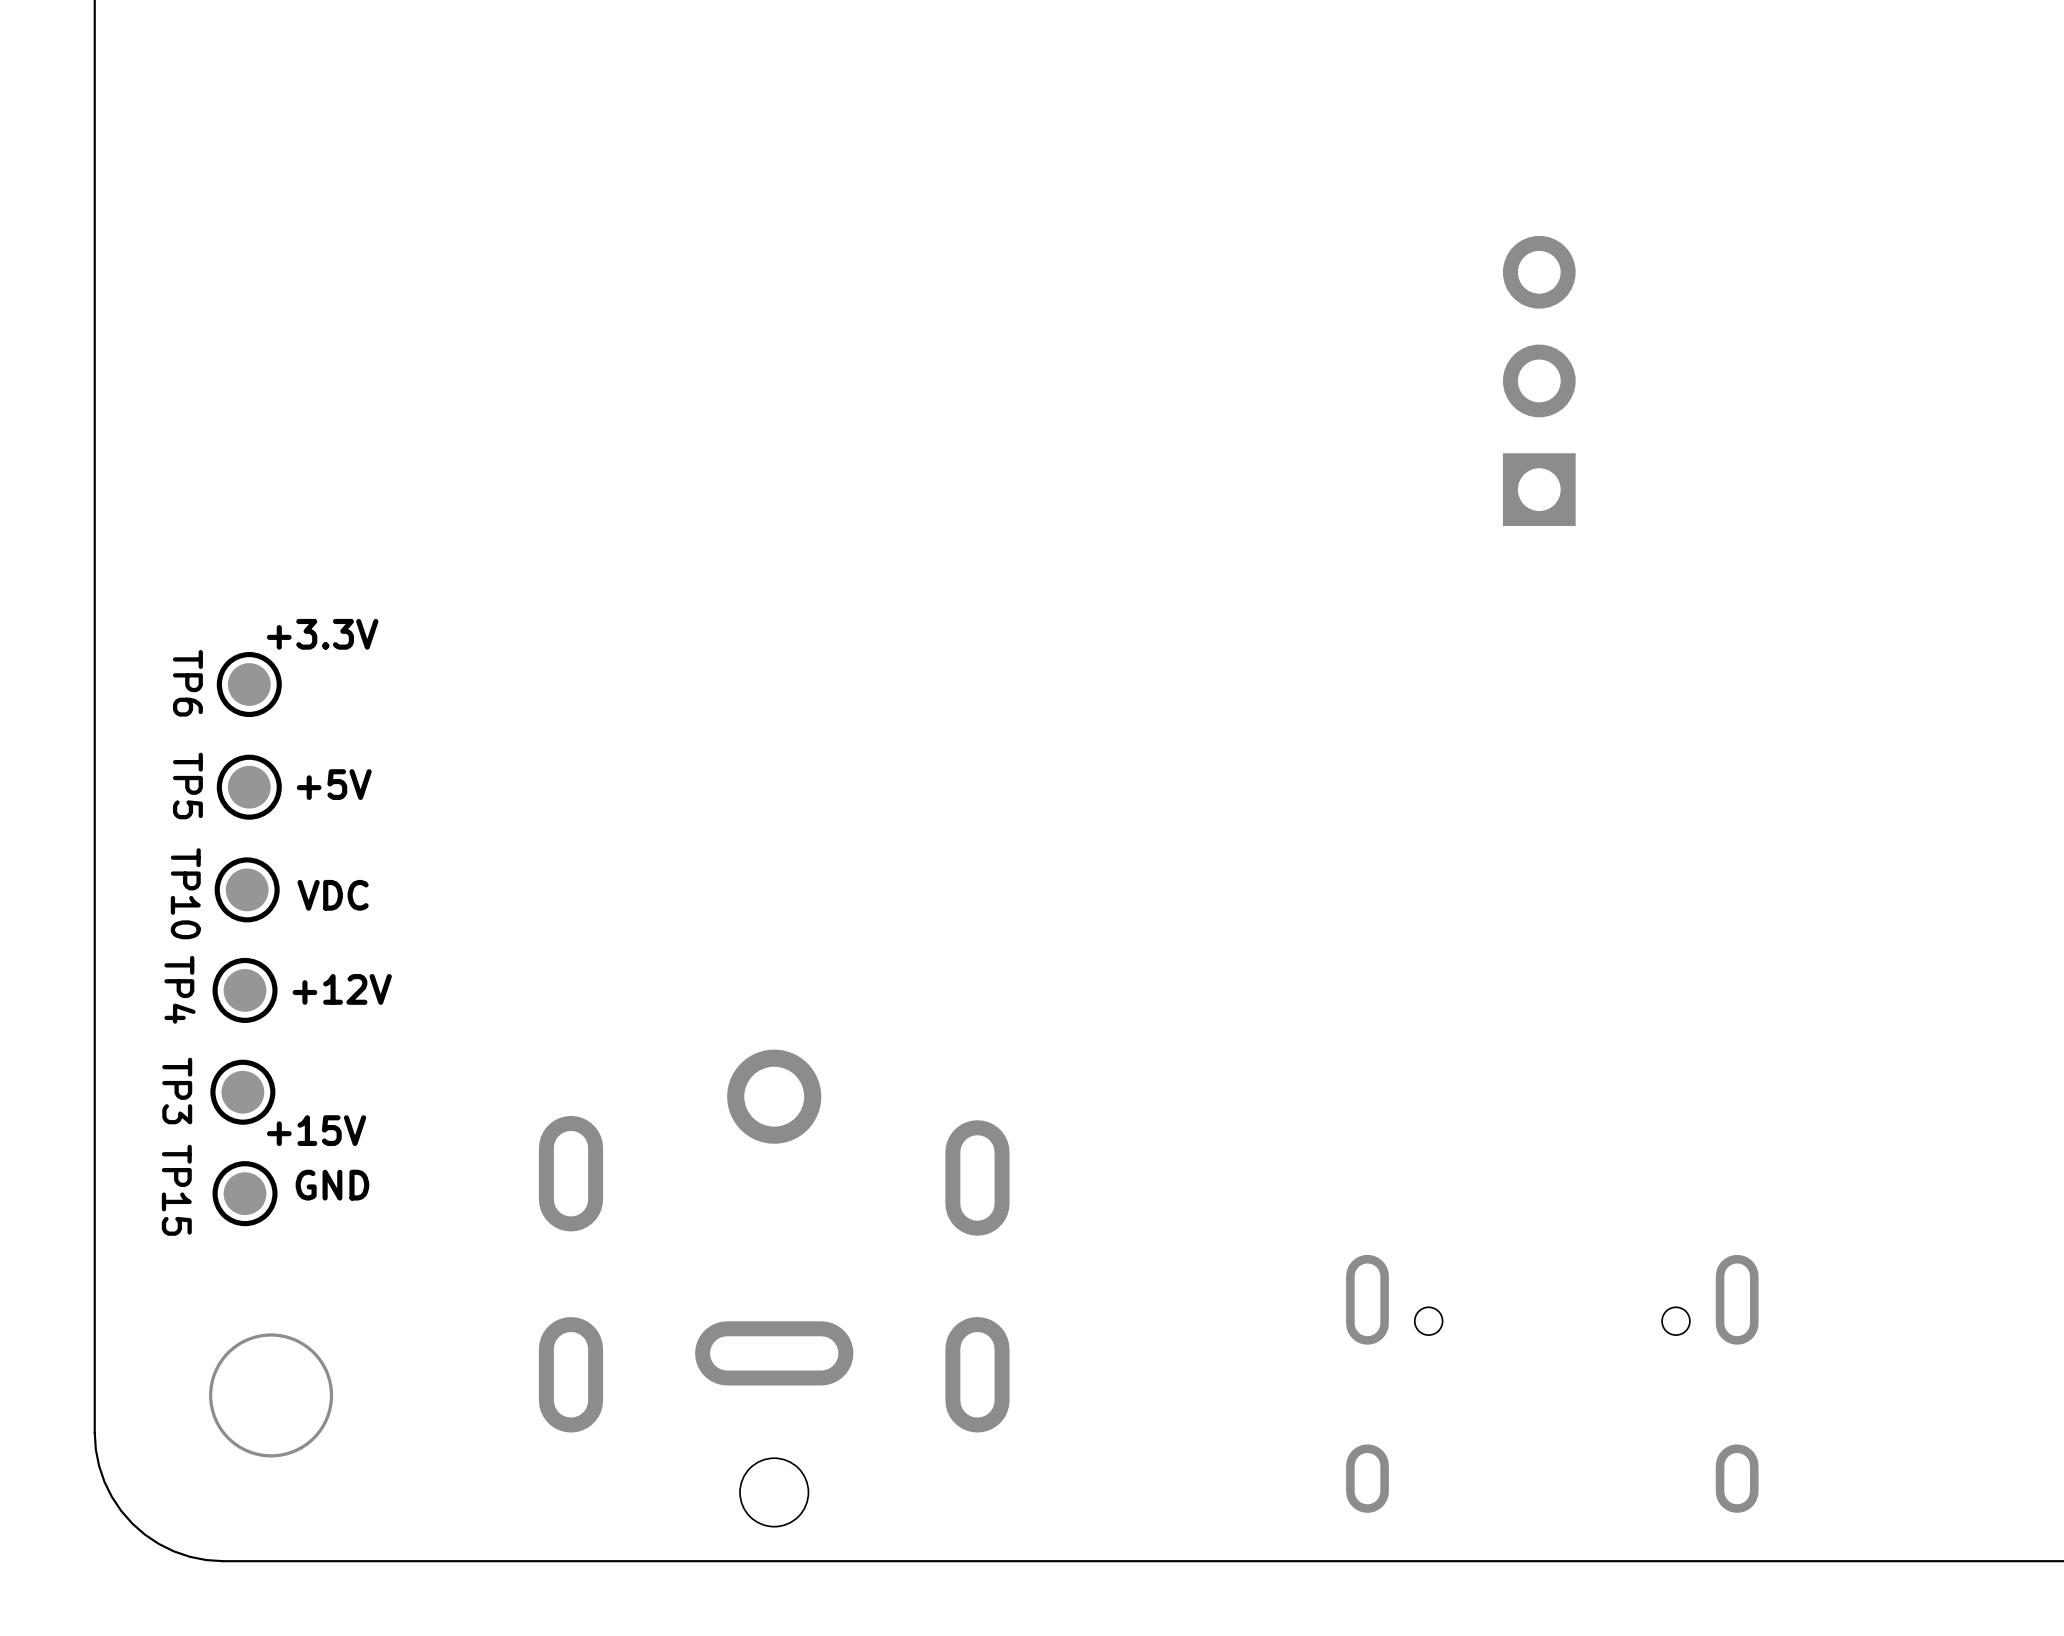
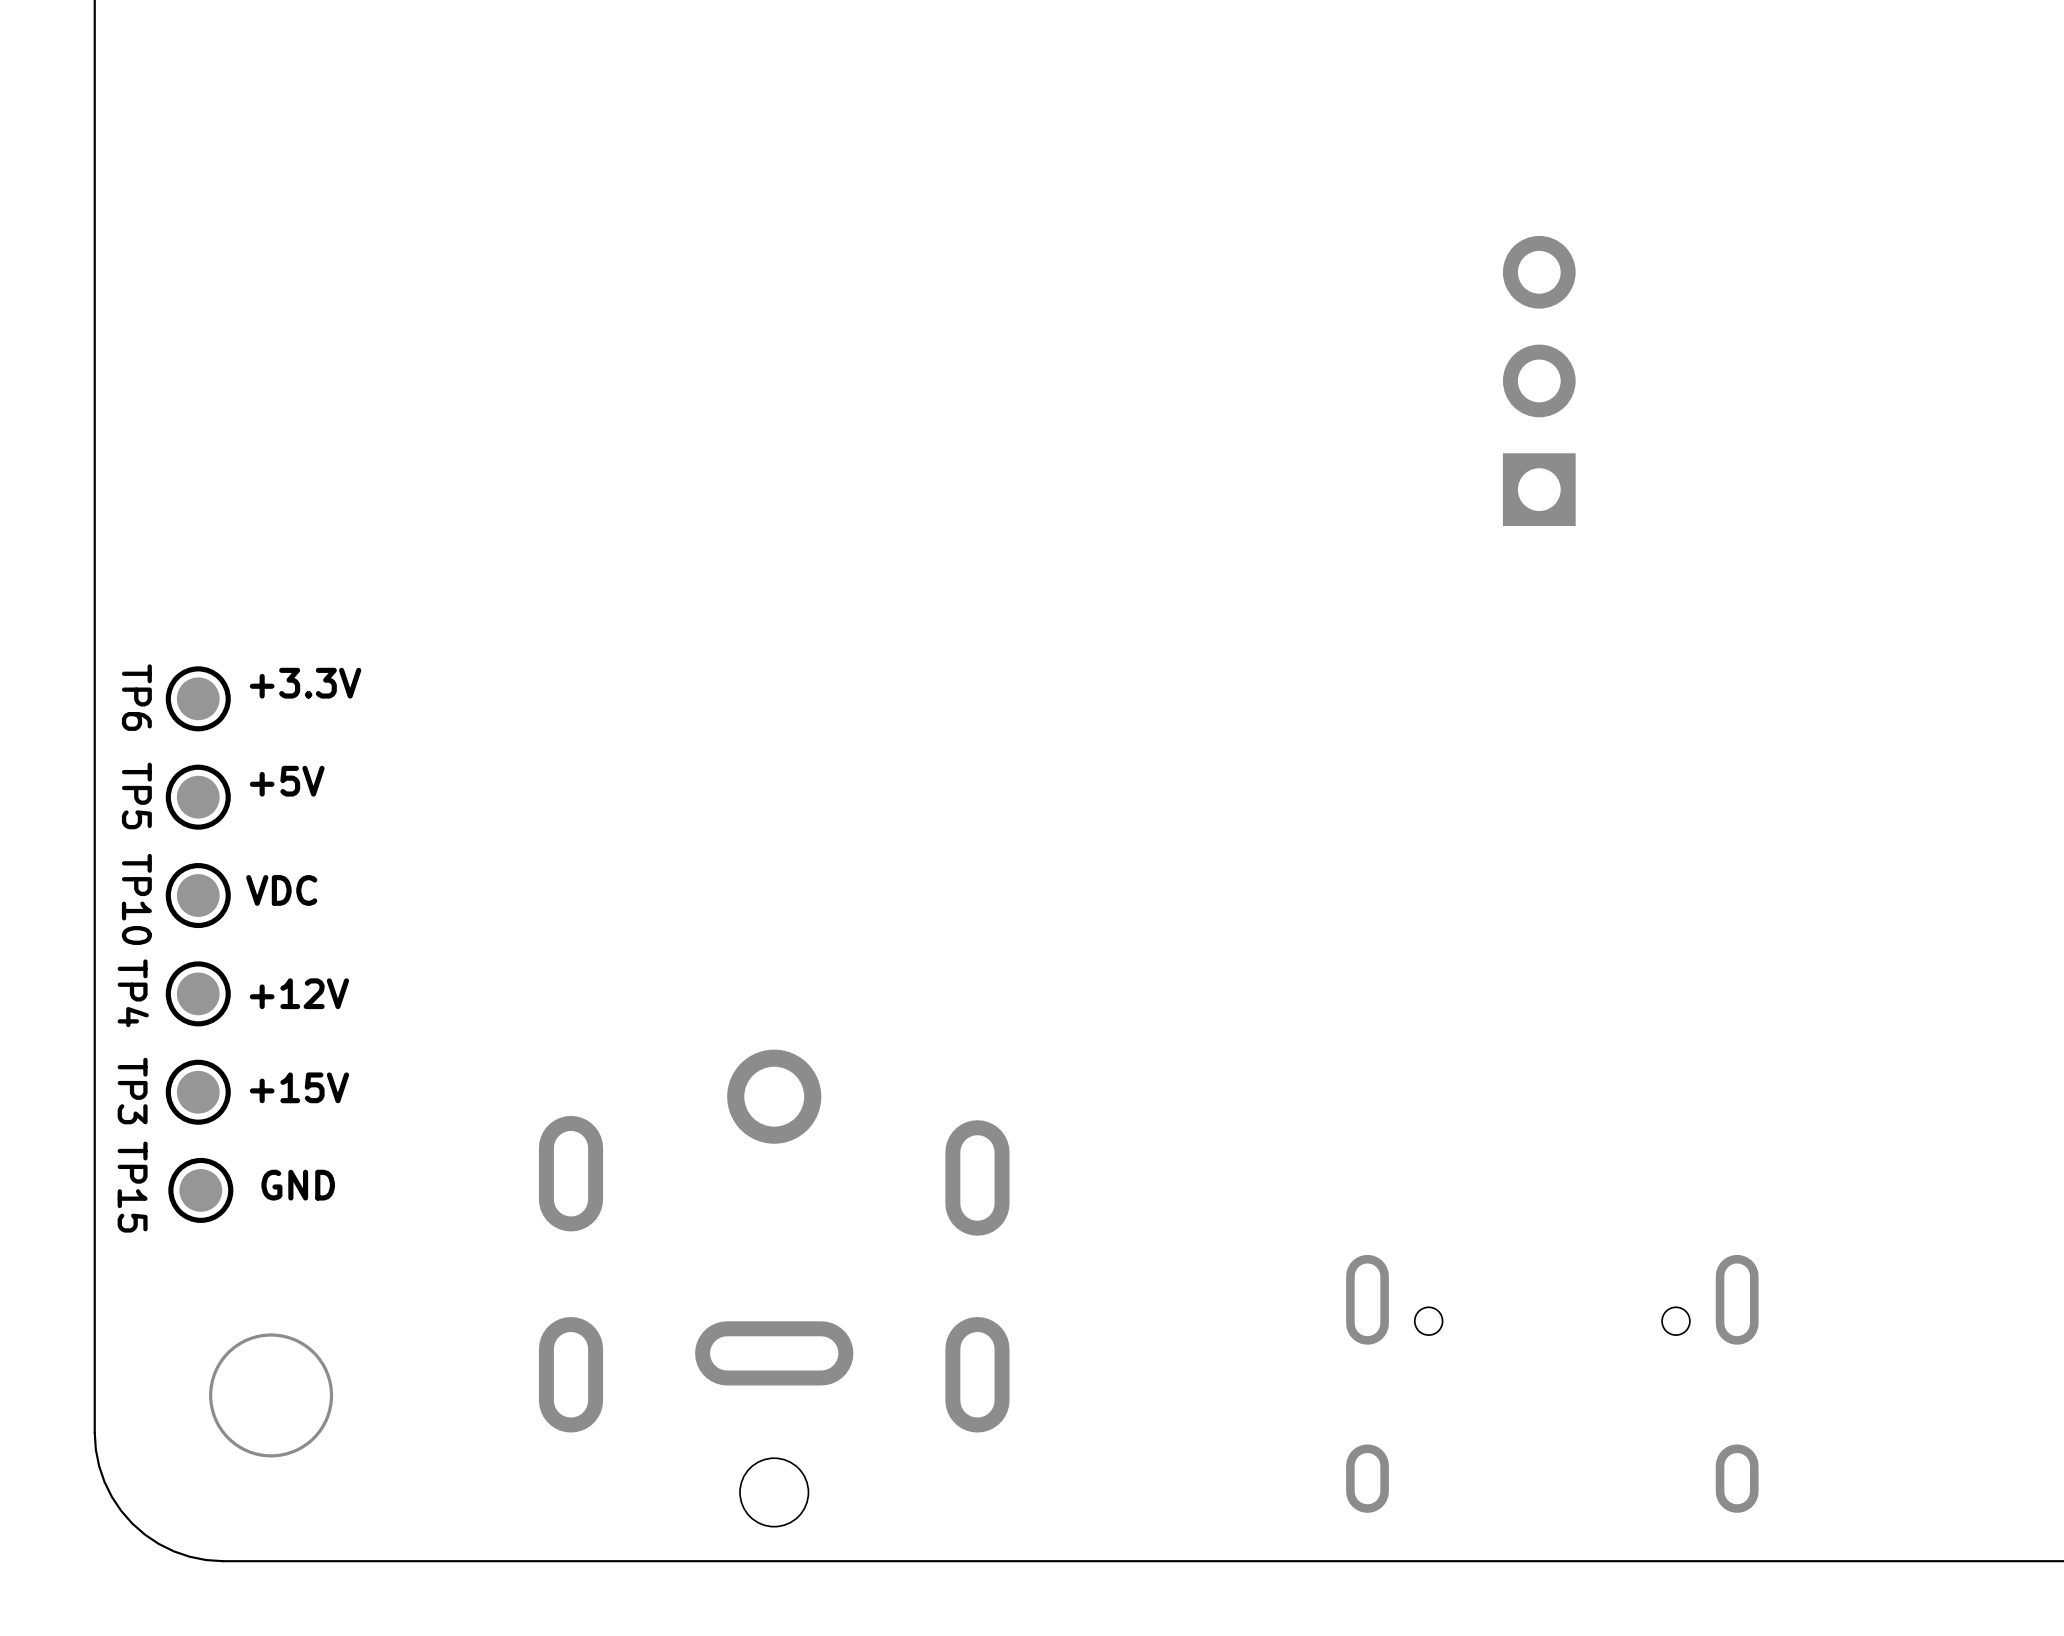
text position: +3.3V (322, 634) -> +3.3V (305, 683)
TP6 position: (249, 684) -> (198, 698)
text position: +5V (334, 784) -> +5V (287, 781)
TP5 position: (249, 787) -> (198, 797)
TP10 position: (247, 889) -> (198, 895)
text position: VDC (333, 895) -> VDC (281, 890)
text position: +12V (342, 989) -> +12V (299, 993)
TP4 position: (245, 990) -> (198, 993)
TP3 position: (242, 1092) -> (198, 1092)
text position: +15V (316, 1130) -> +15V (299, 1087)
text position: GND (332, 1185) -> GND (298, 1185)
TP15 position: (245, 1193) -> (200, 1190)

